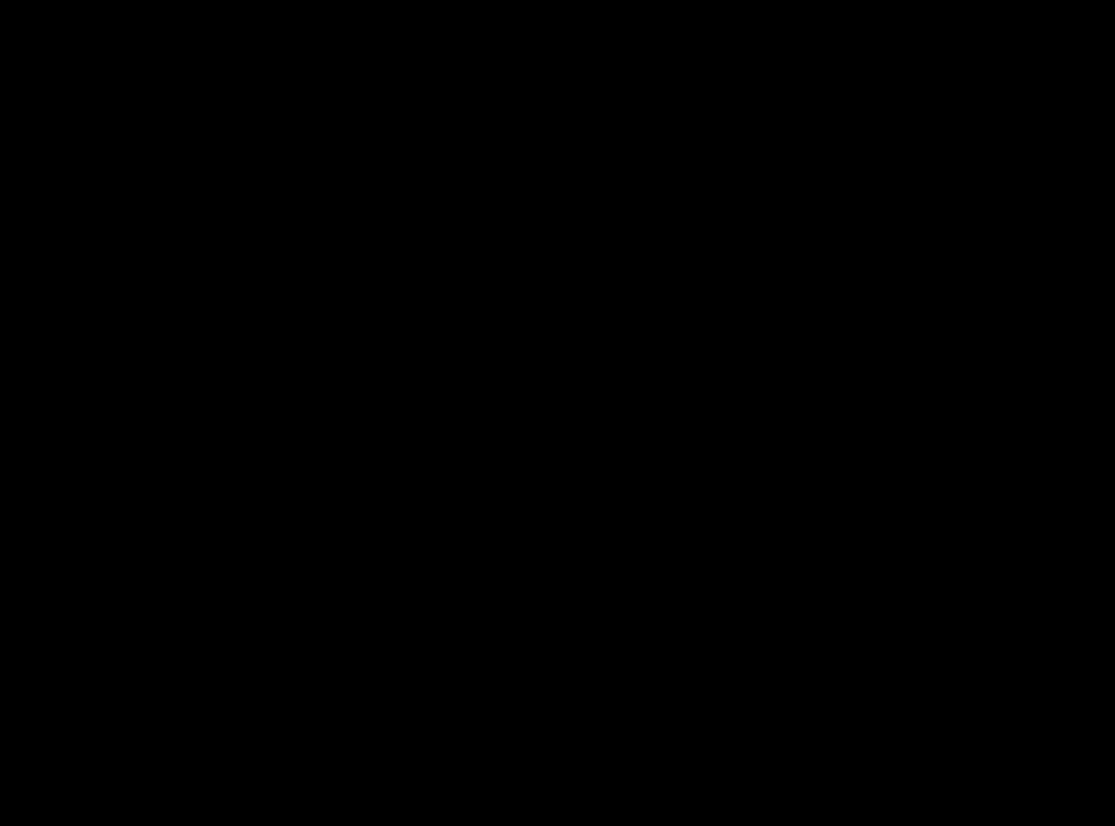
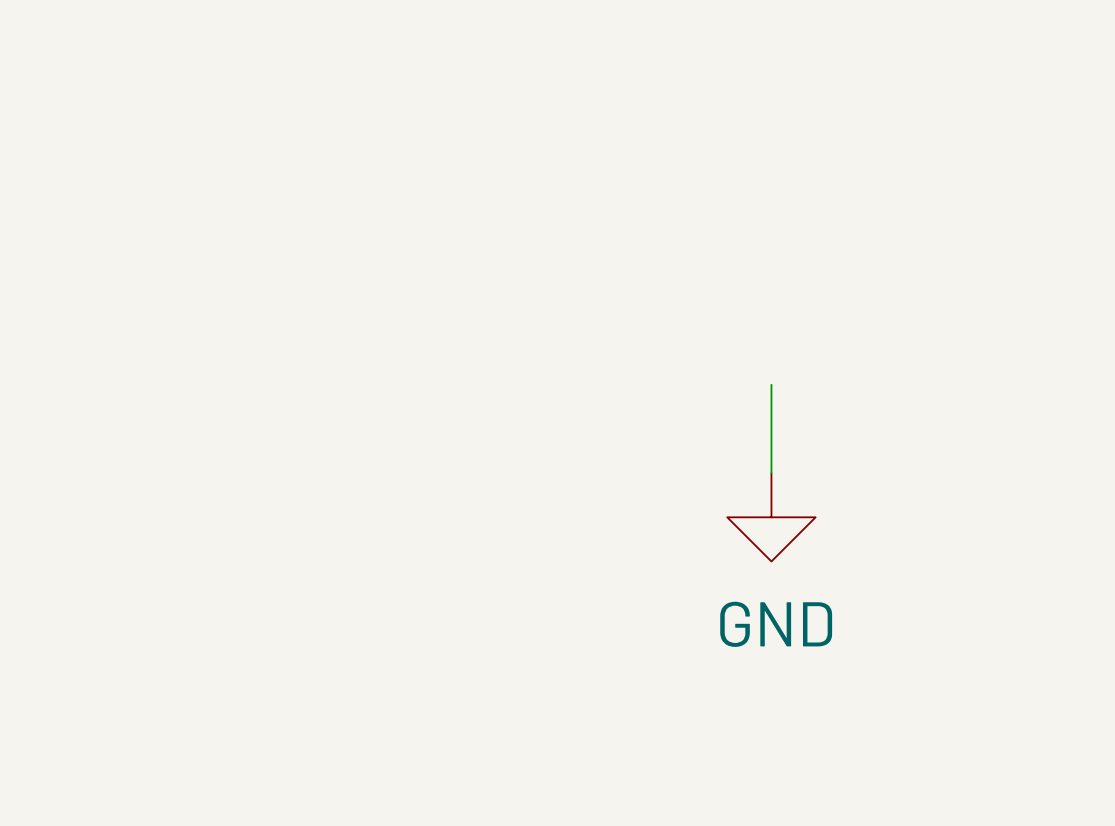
wire: none -> (771, 384) (771, 473)
power symbol: none -> GND (771, 517)

